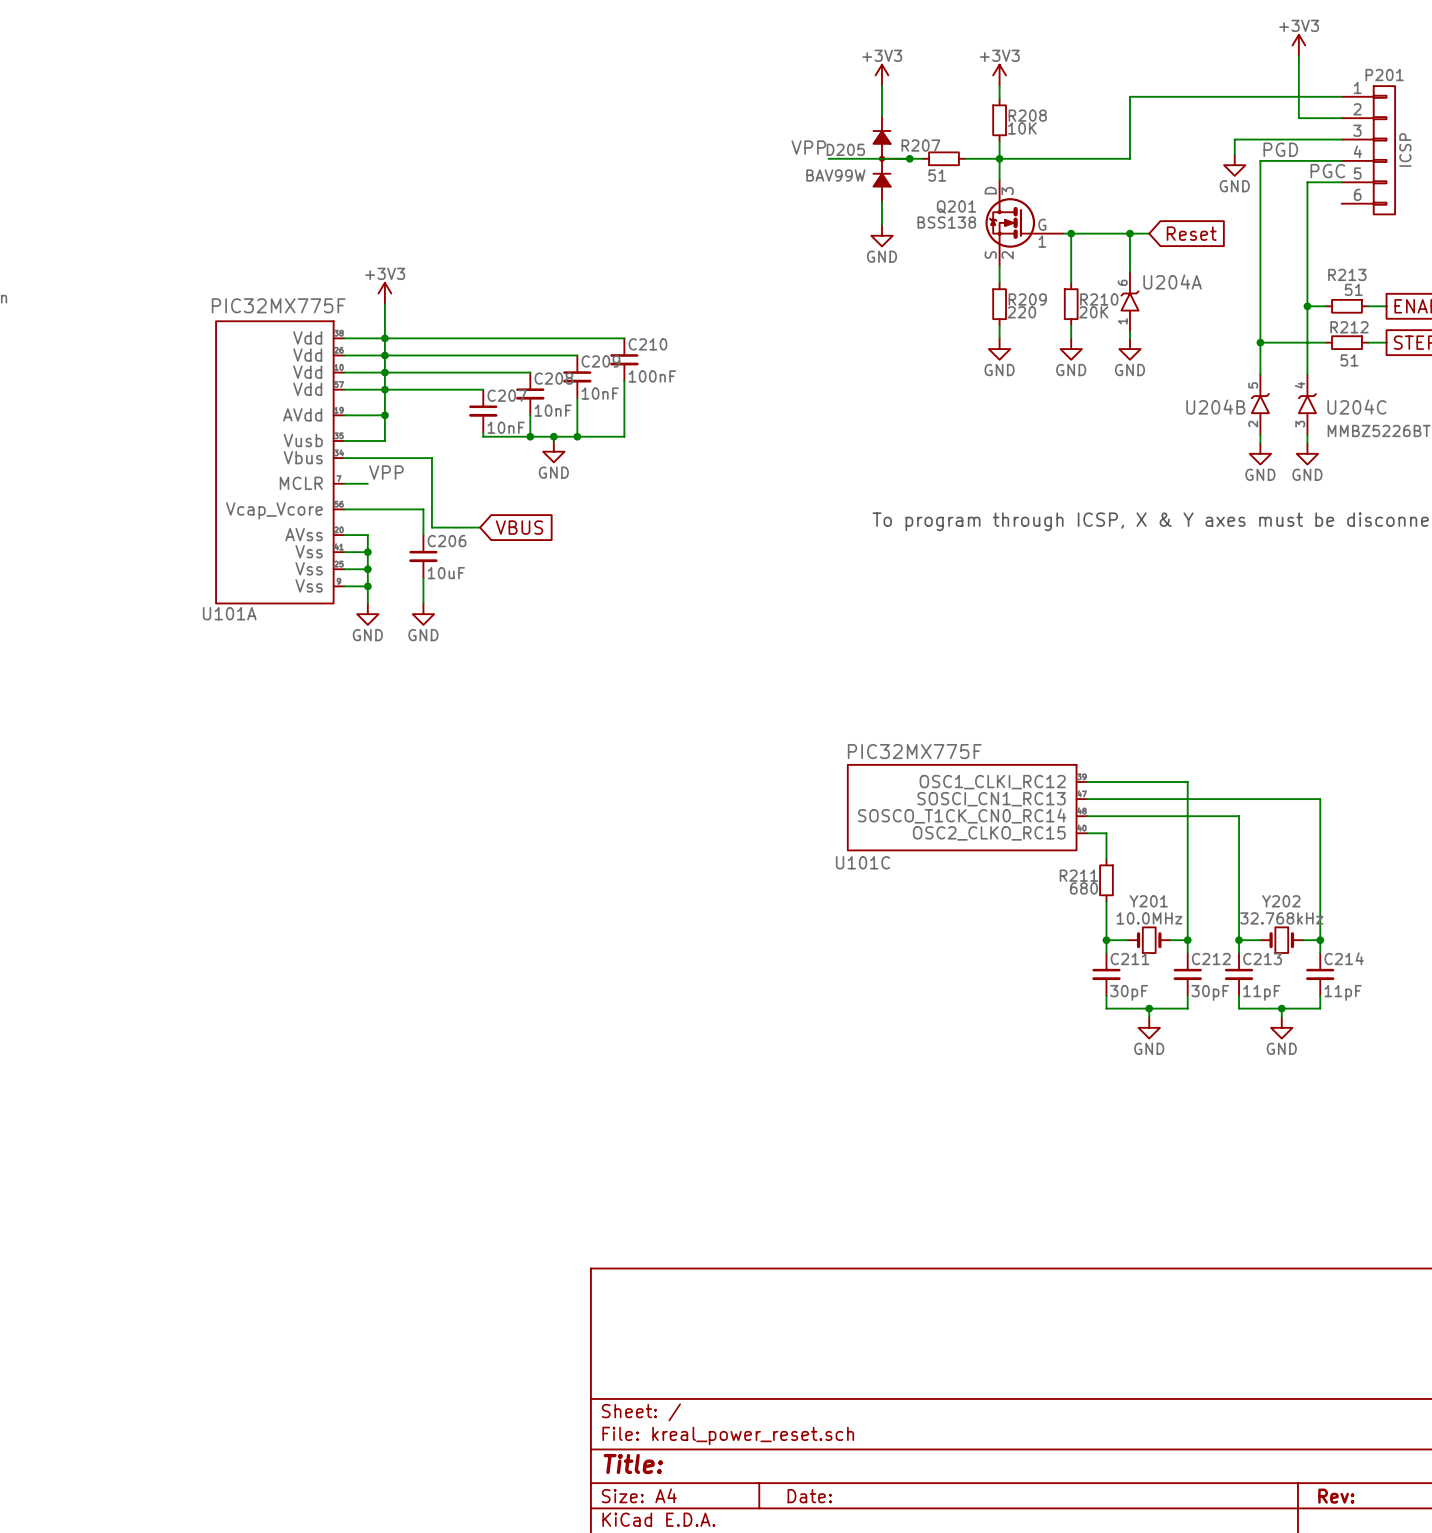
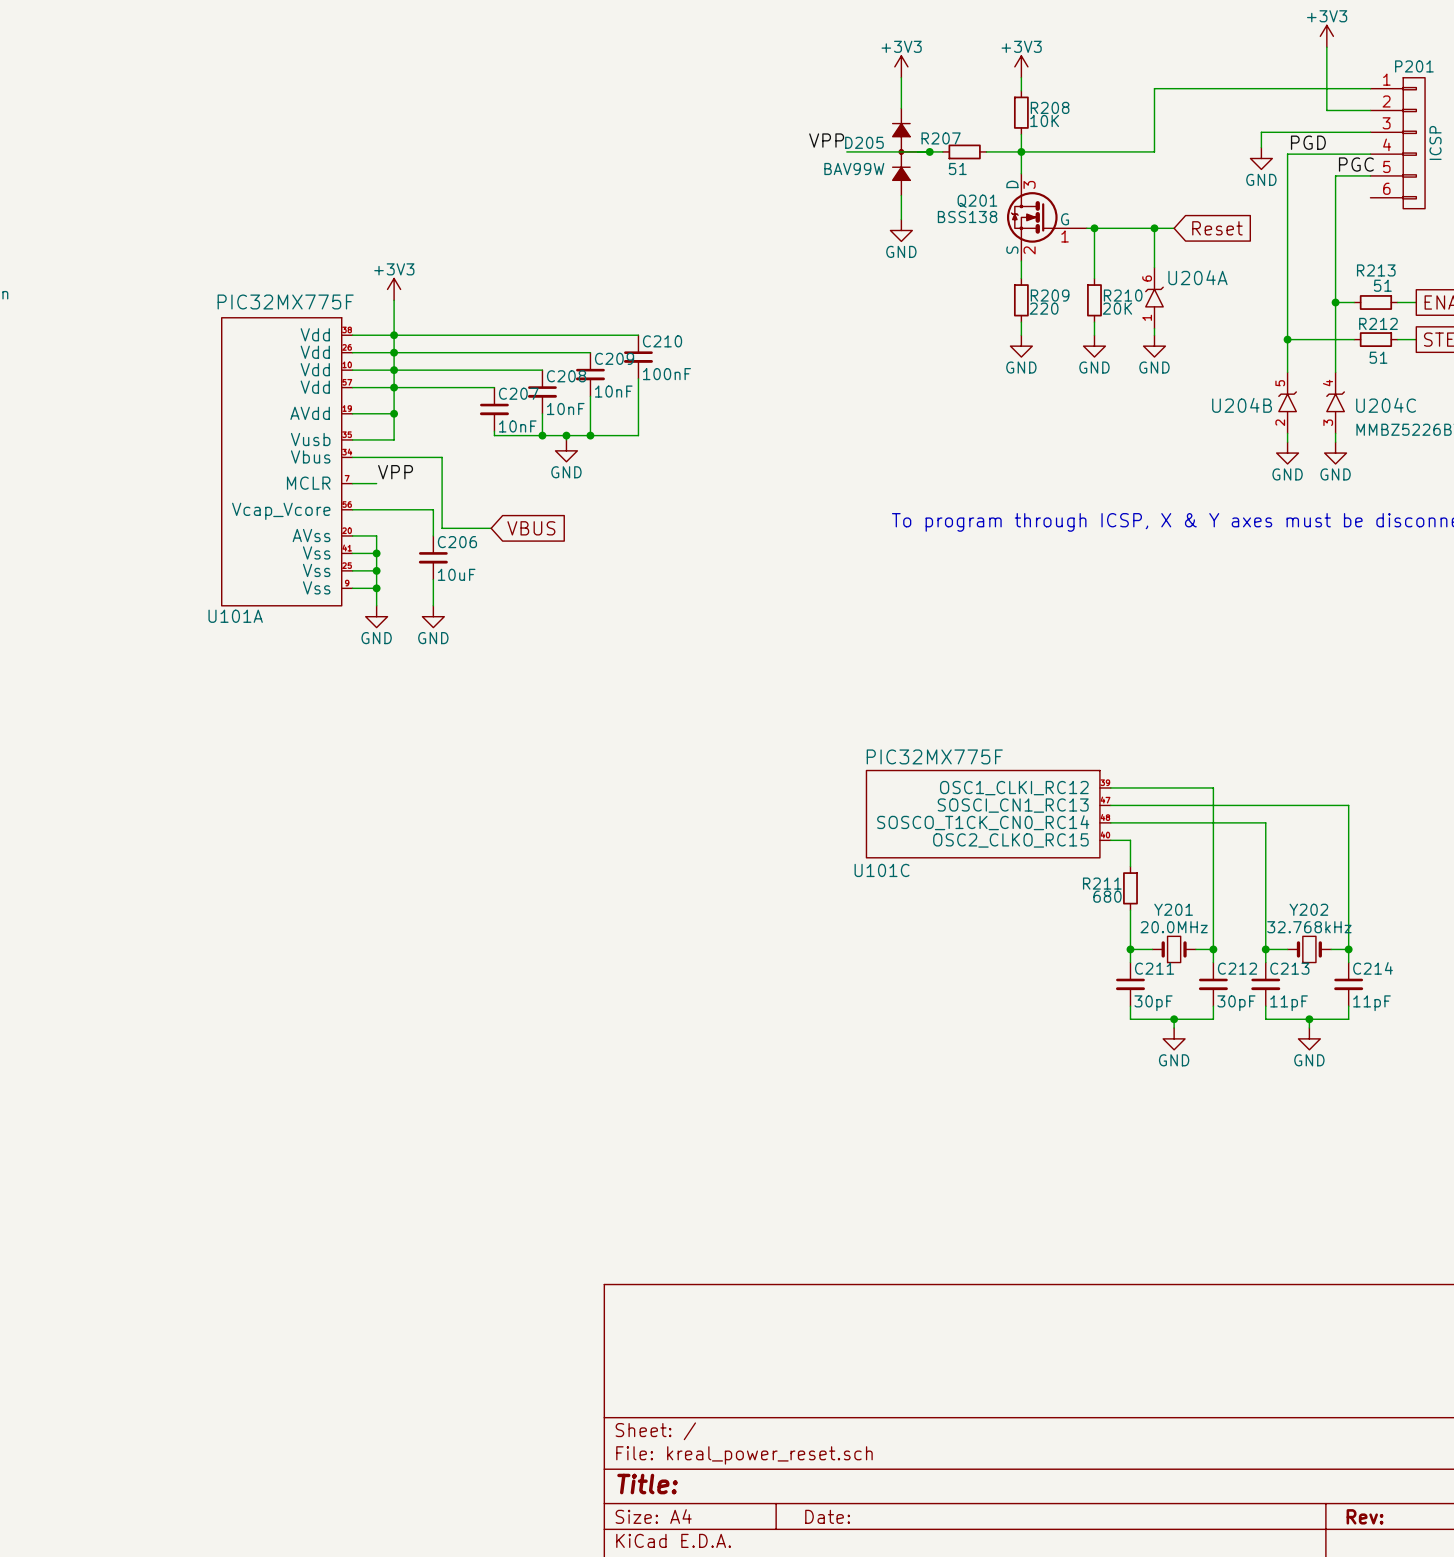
Y201 value: 10.0MHz (1149, 918) -> 20.0MHz (1174, 927)

